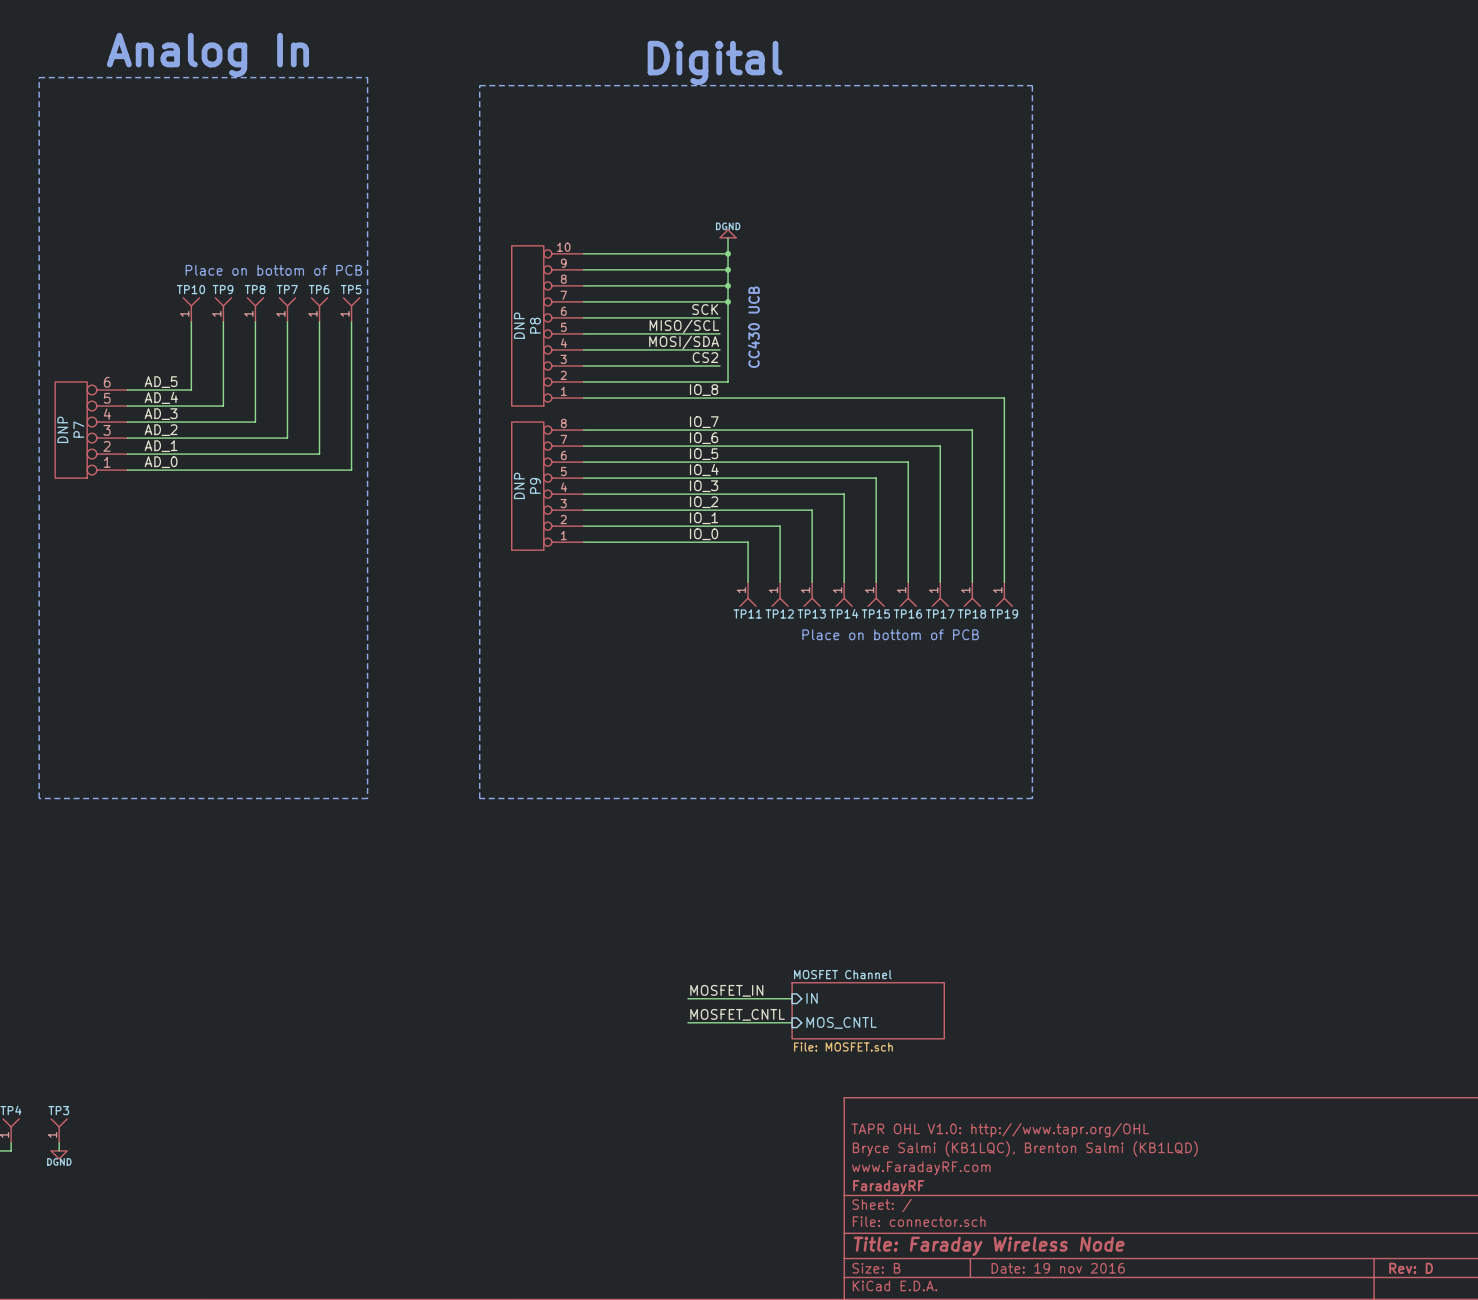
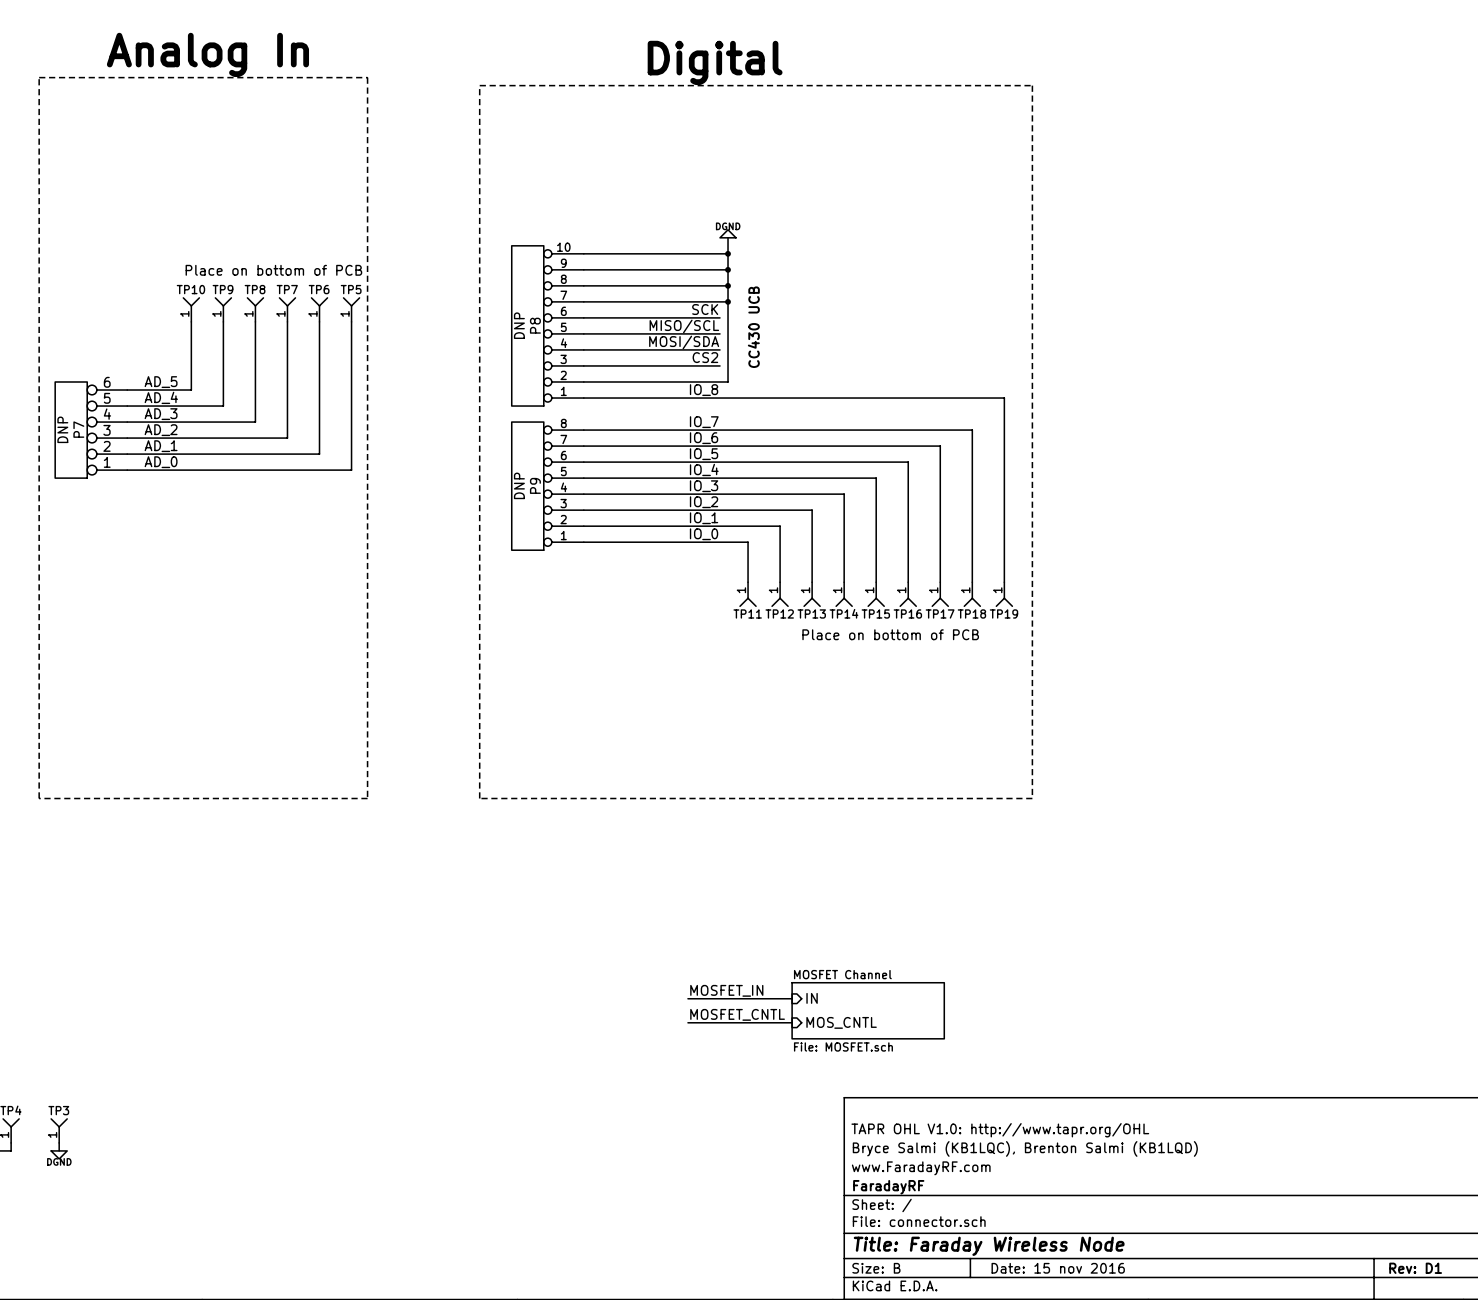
title block: Date: 19 nov 2016 (1058, 1268) -> Date: 15 nov 2016 (1058, 1268)
title block: Rev: D (1411, 1268) -> Rev: D1 (1415, 1268)

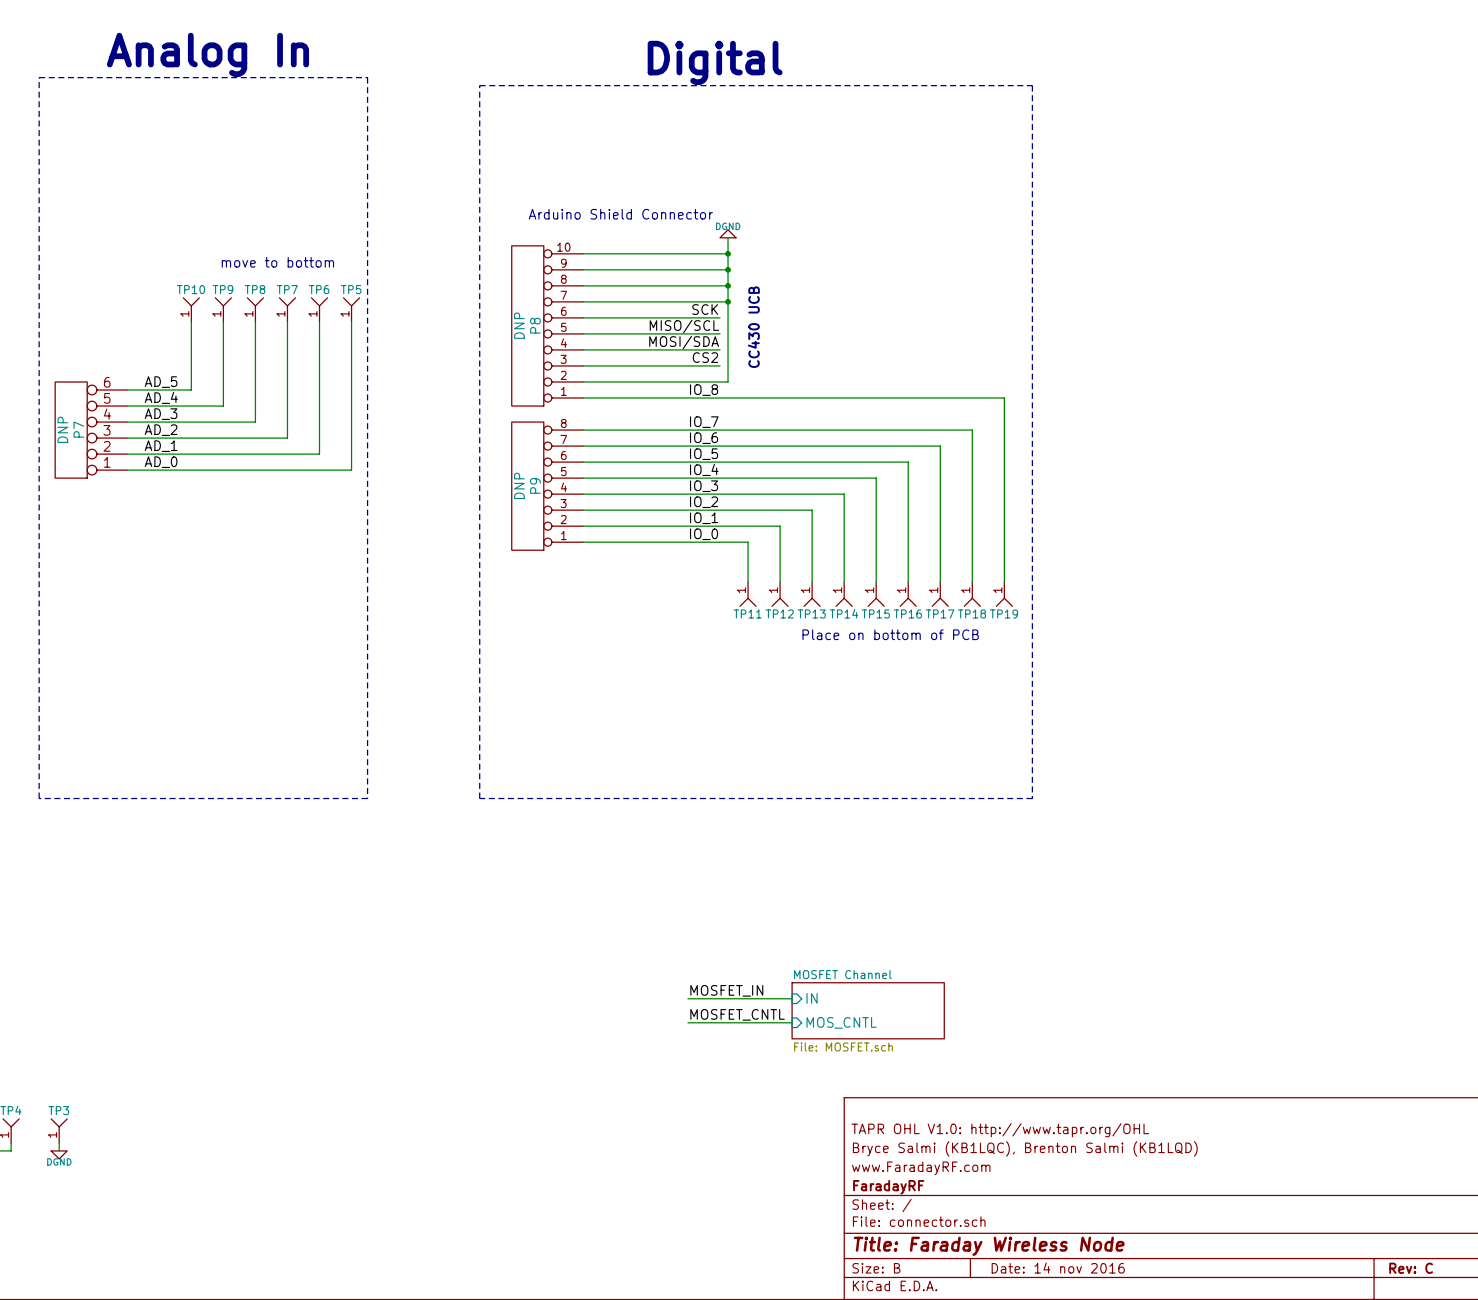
text: none -> Arduino Shield Connector (620, 214)
text: none -> move to bottom (277, 262)
text: Place on bottom of PCB (273, 270) -> none
title block: Date: 15 nov 2016 (1058, 1268) -> Date: 14 nov 2016 (1058, 1268)
title block: Rev: D1 (1415, 1268) -> Rev: C (1411, 1268)

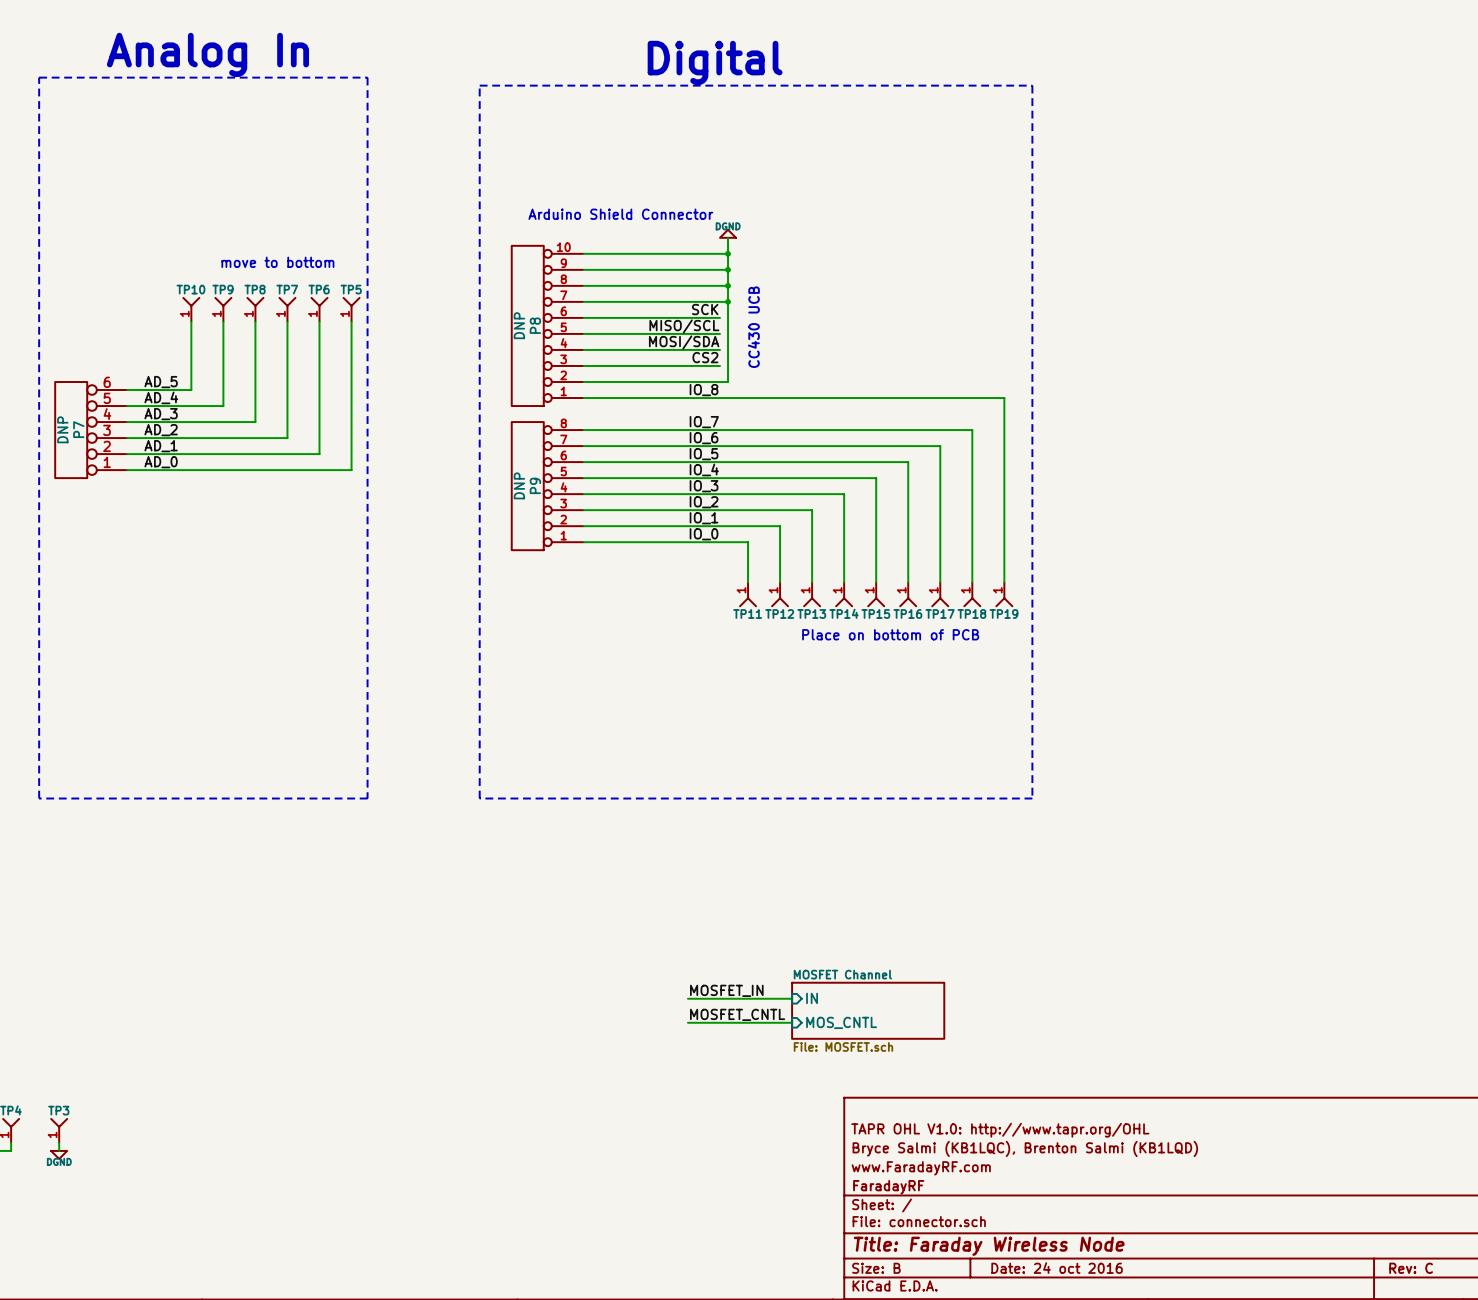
title block: Date: 14 nov 2016 (1058, 1268) -> Date: 24 oct 2016 (1057, 1268)

